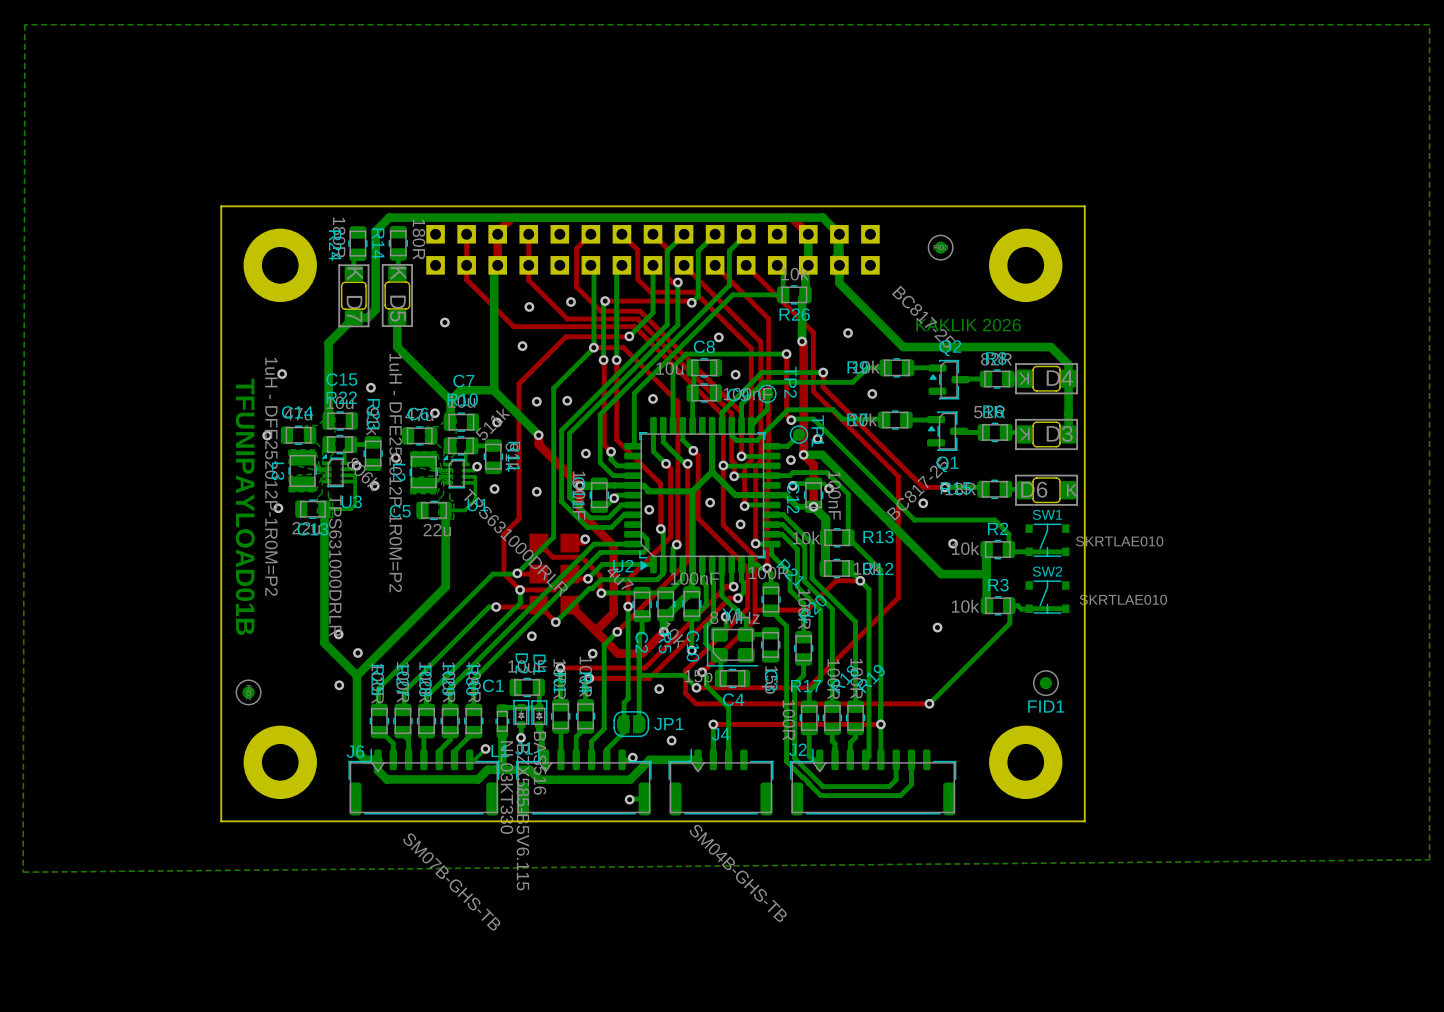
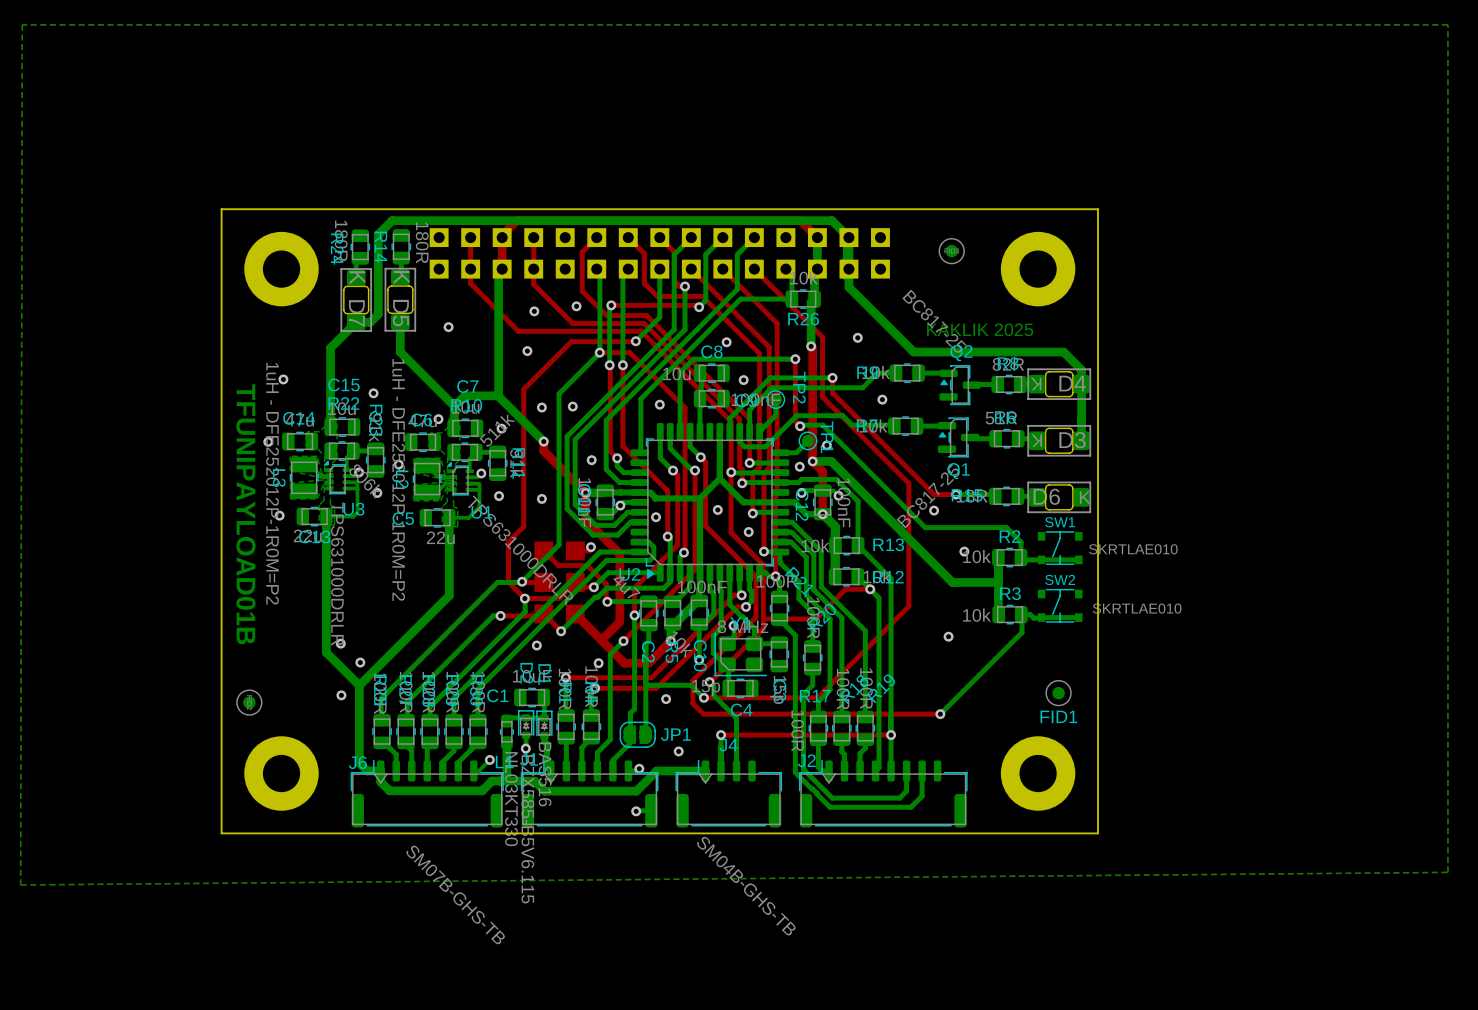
text: KAKLIK 2026 (968, 325) -> KAKLIK 2025 (980, 329)

